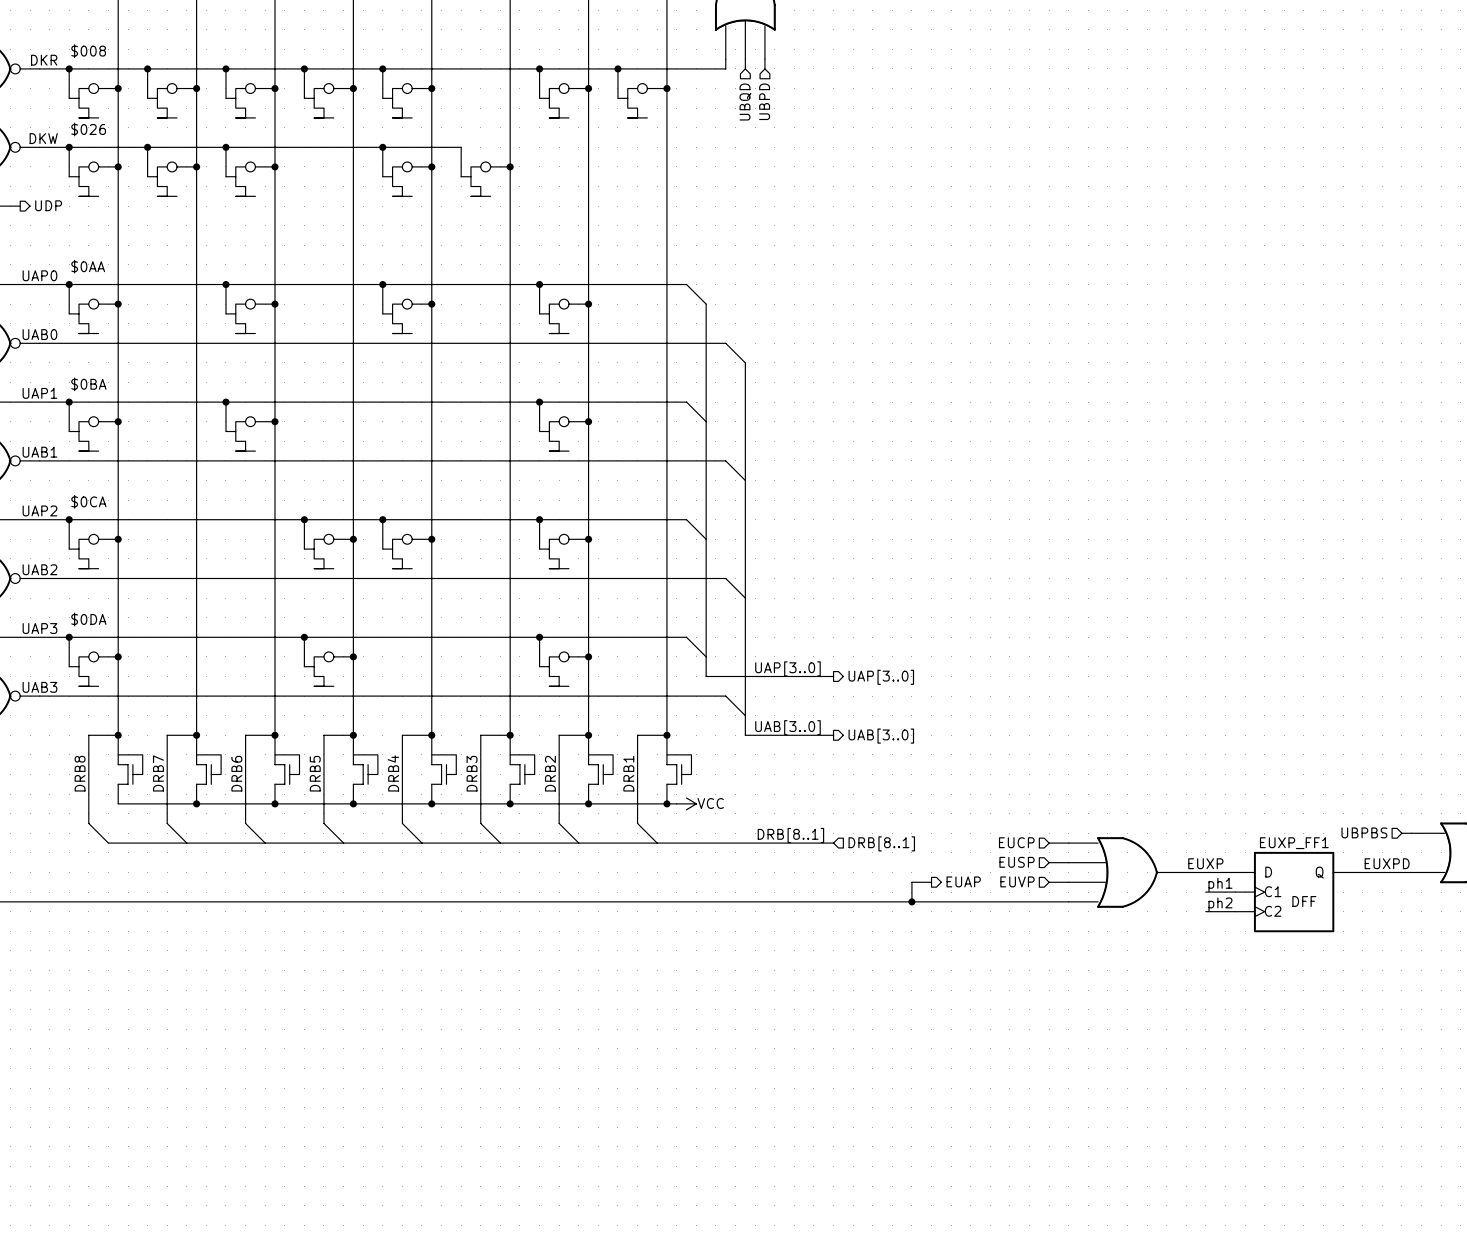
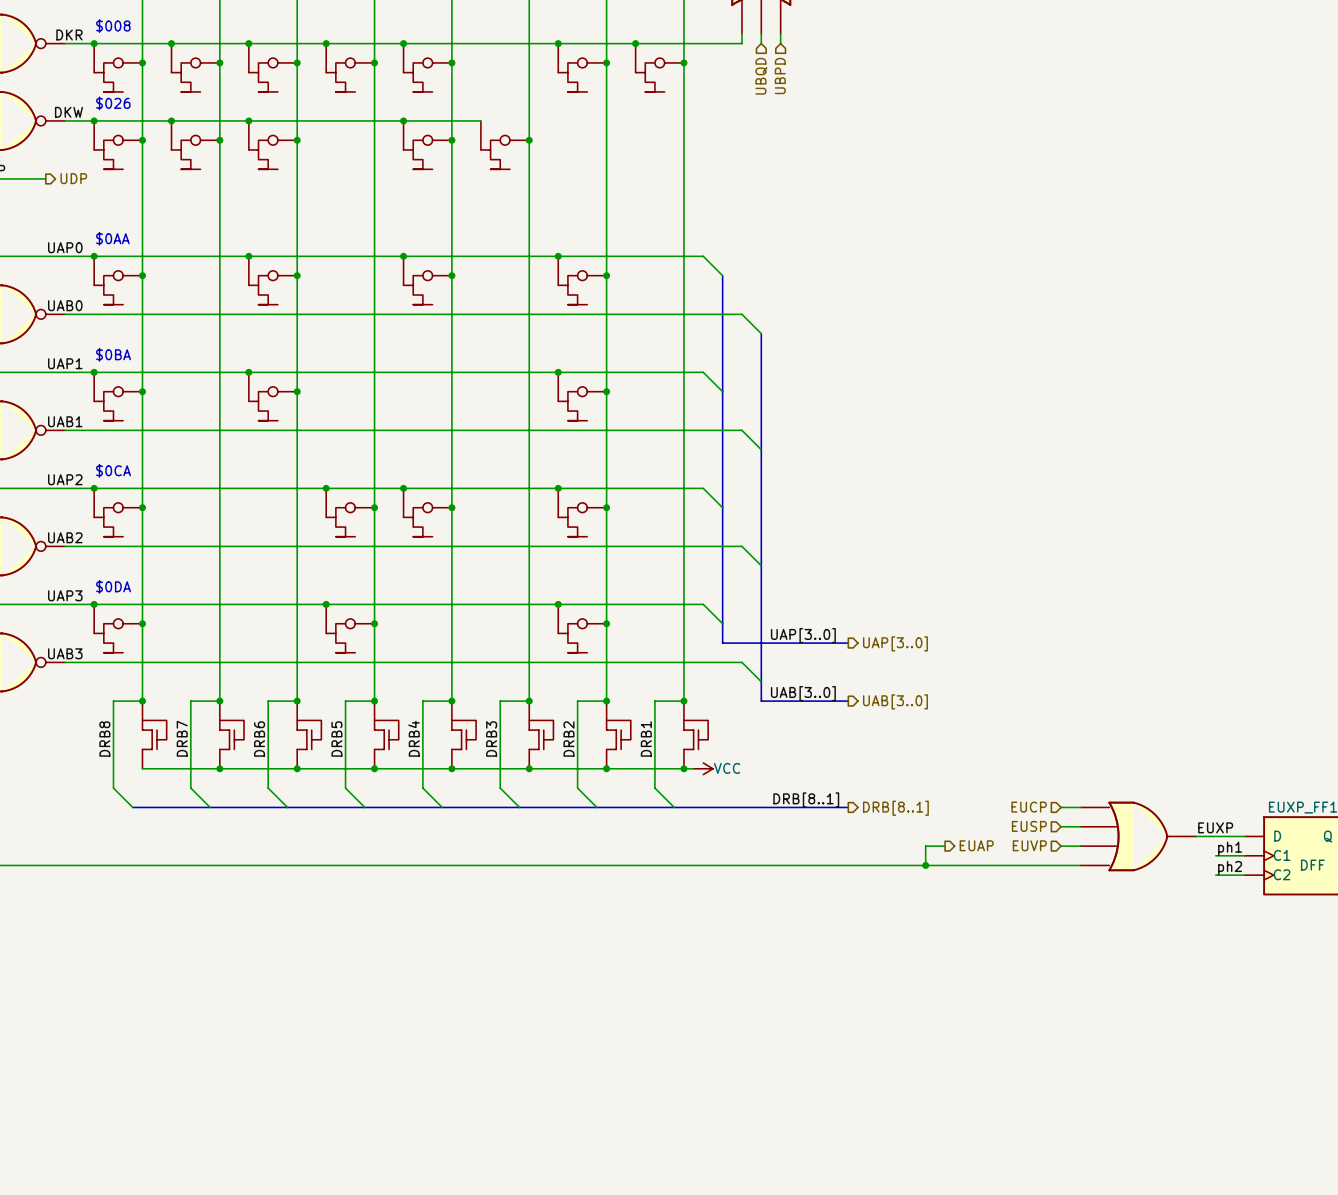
hierarchical label shape: input (881, 843) -> output (895, 808)

